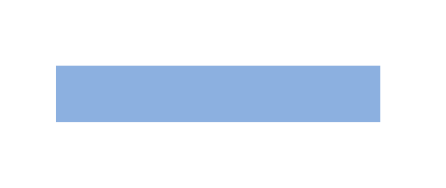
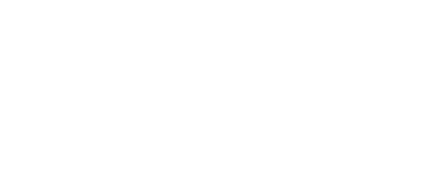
drawing: [55, 65, 381, 123] -> none

